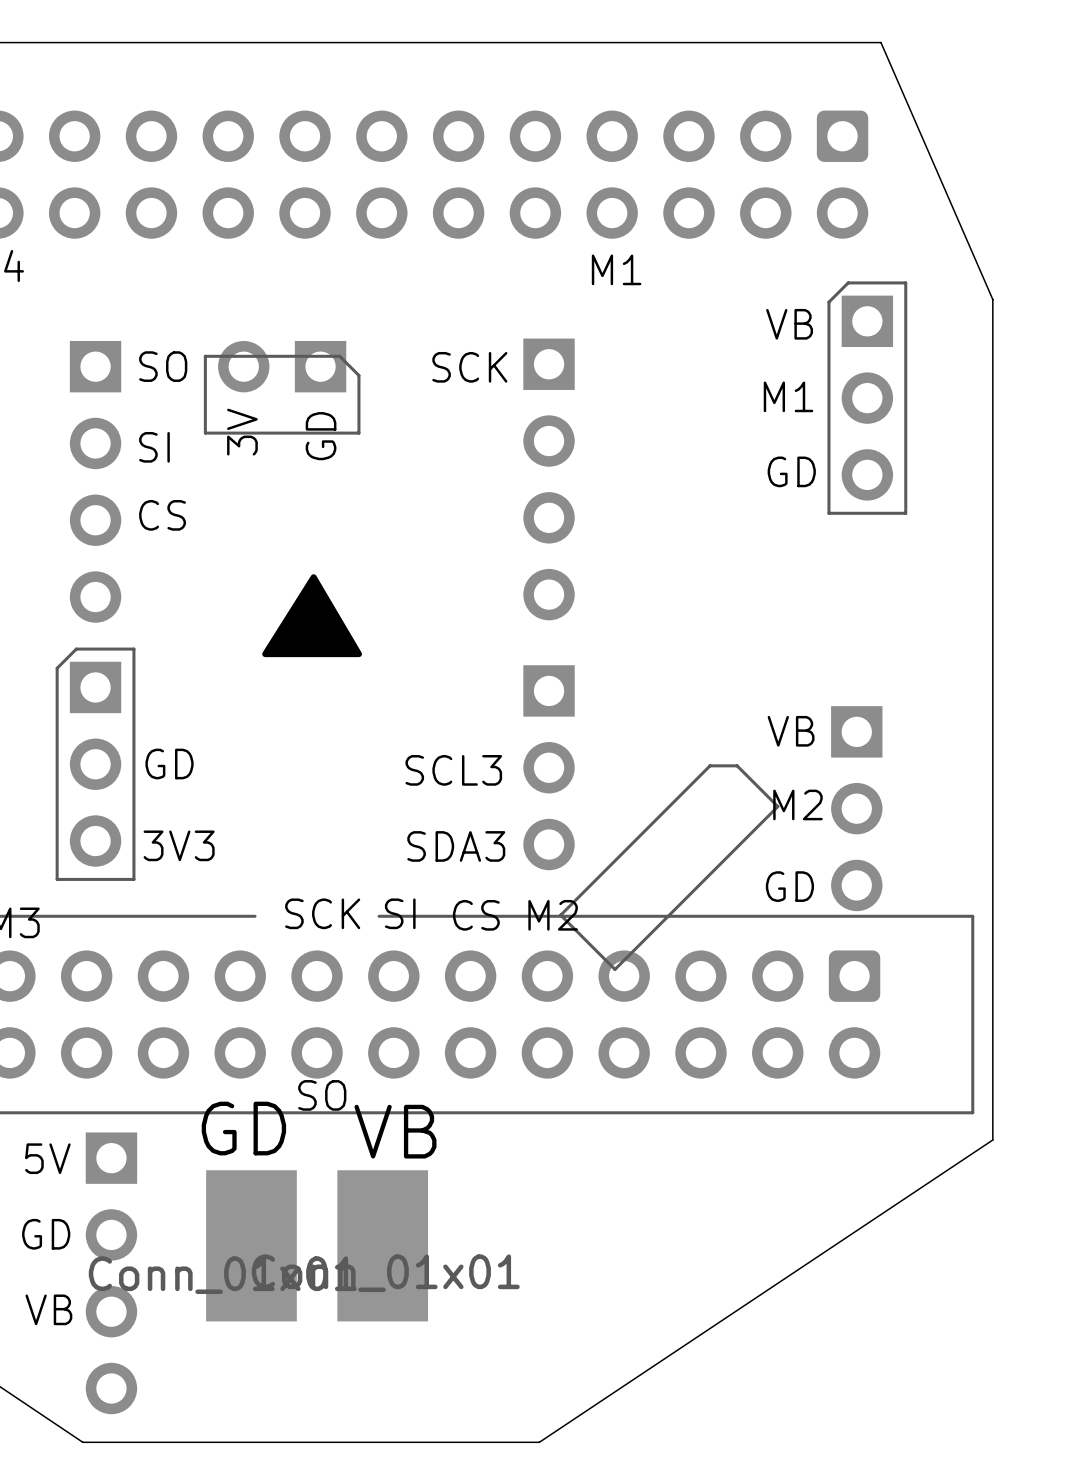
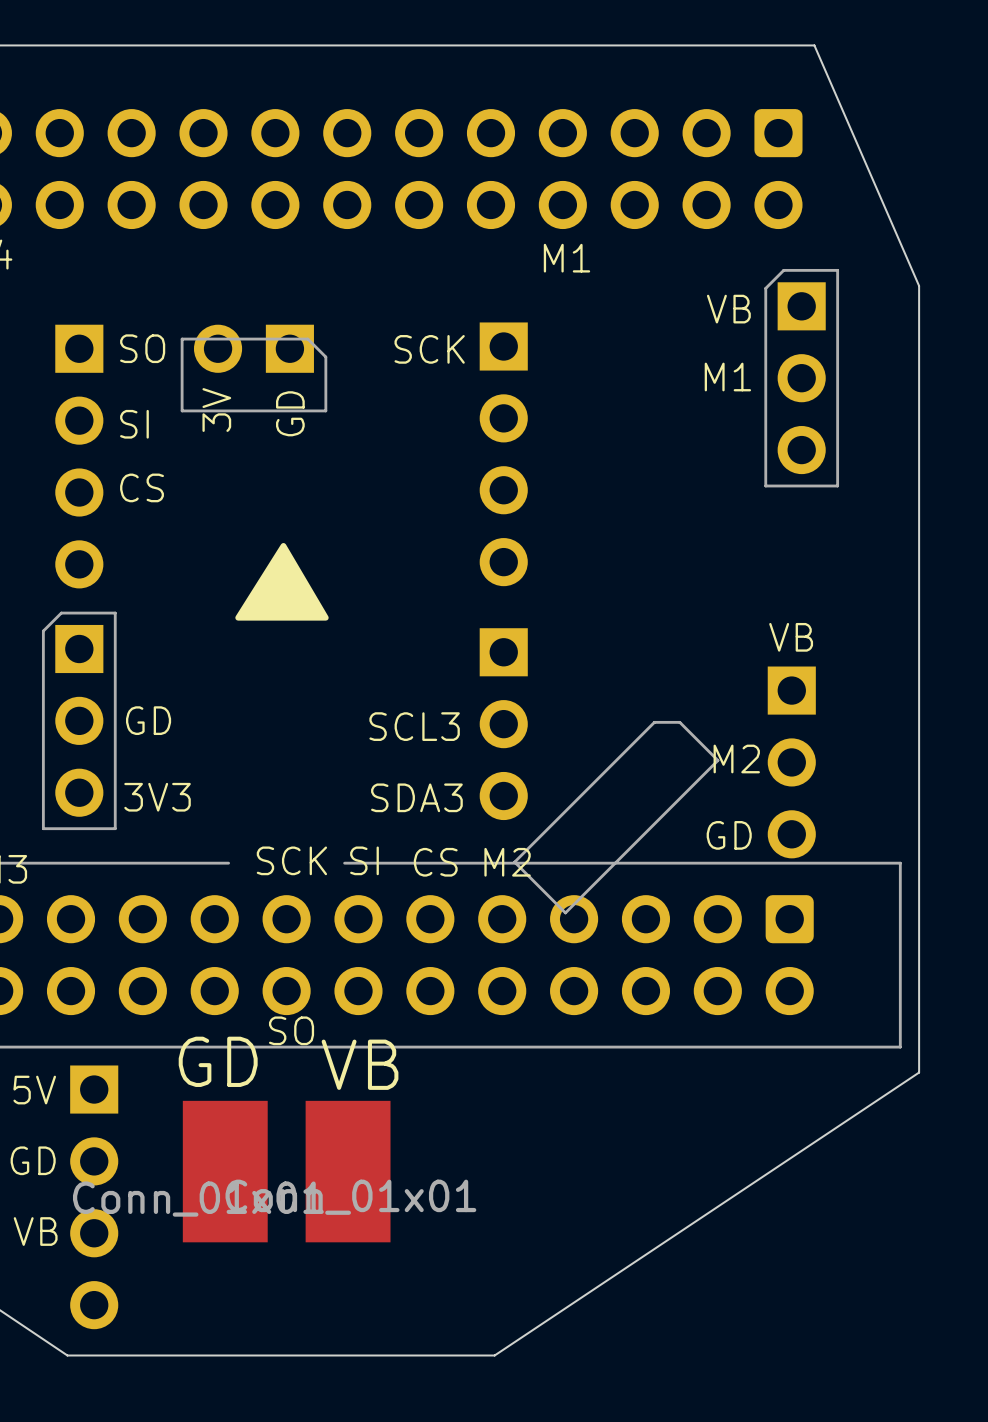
text: GD (791, 471) -> none
text position: VB (791, 731) -> VB (791, 637)

